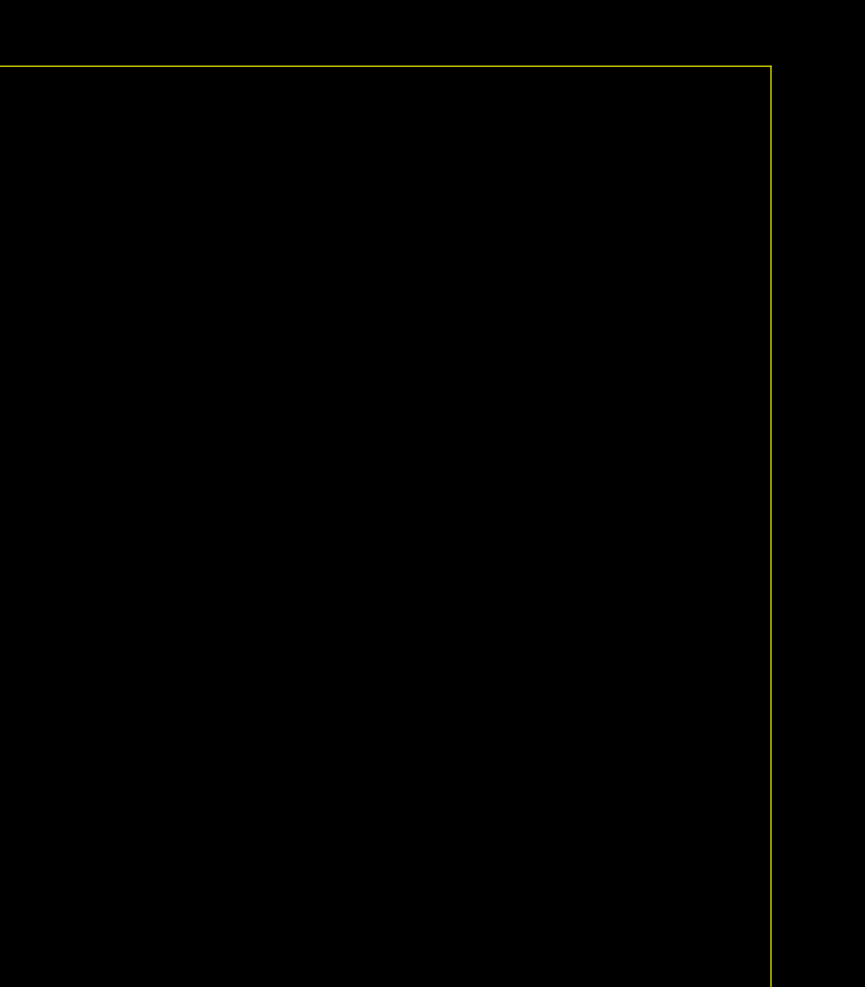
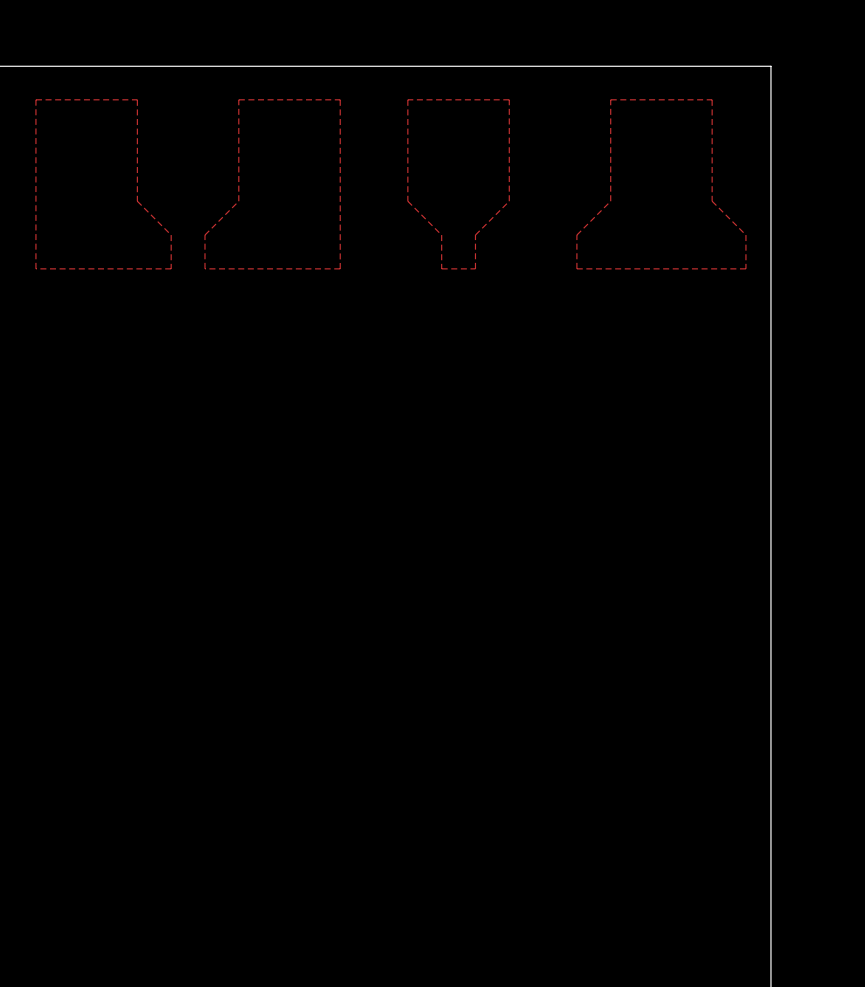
top zone outline: none -> (35, 99) (137, 99) (137, 201) (171, 235) (171, 268) (35, 268) (35, 99)
top zone outline: none -> (238, 99) (340, 99) (340, 268) (204, 268) (204, 235) (238, 201) (238, 99)
top zone outline: none -> (407, 99) (509, 99) (509, 201) (475, 235) (475, 268) (441, 268) (441, 235) (407, 201) (407, 99)
top zone outline: none -> (610, 99) (610, 201) (576, 235) (576, 268) (745, 268) (745, 235) (712, 201) (712, 99) (610, 99)

